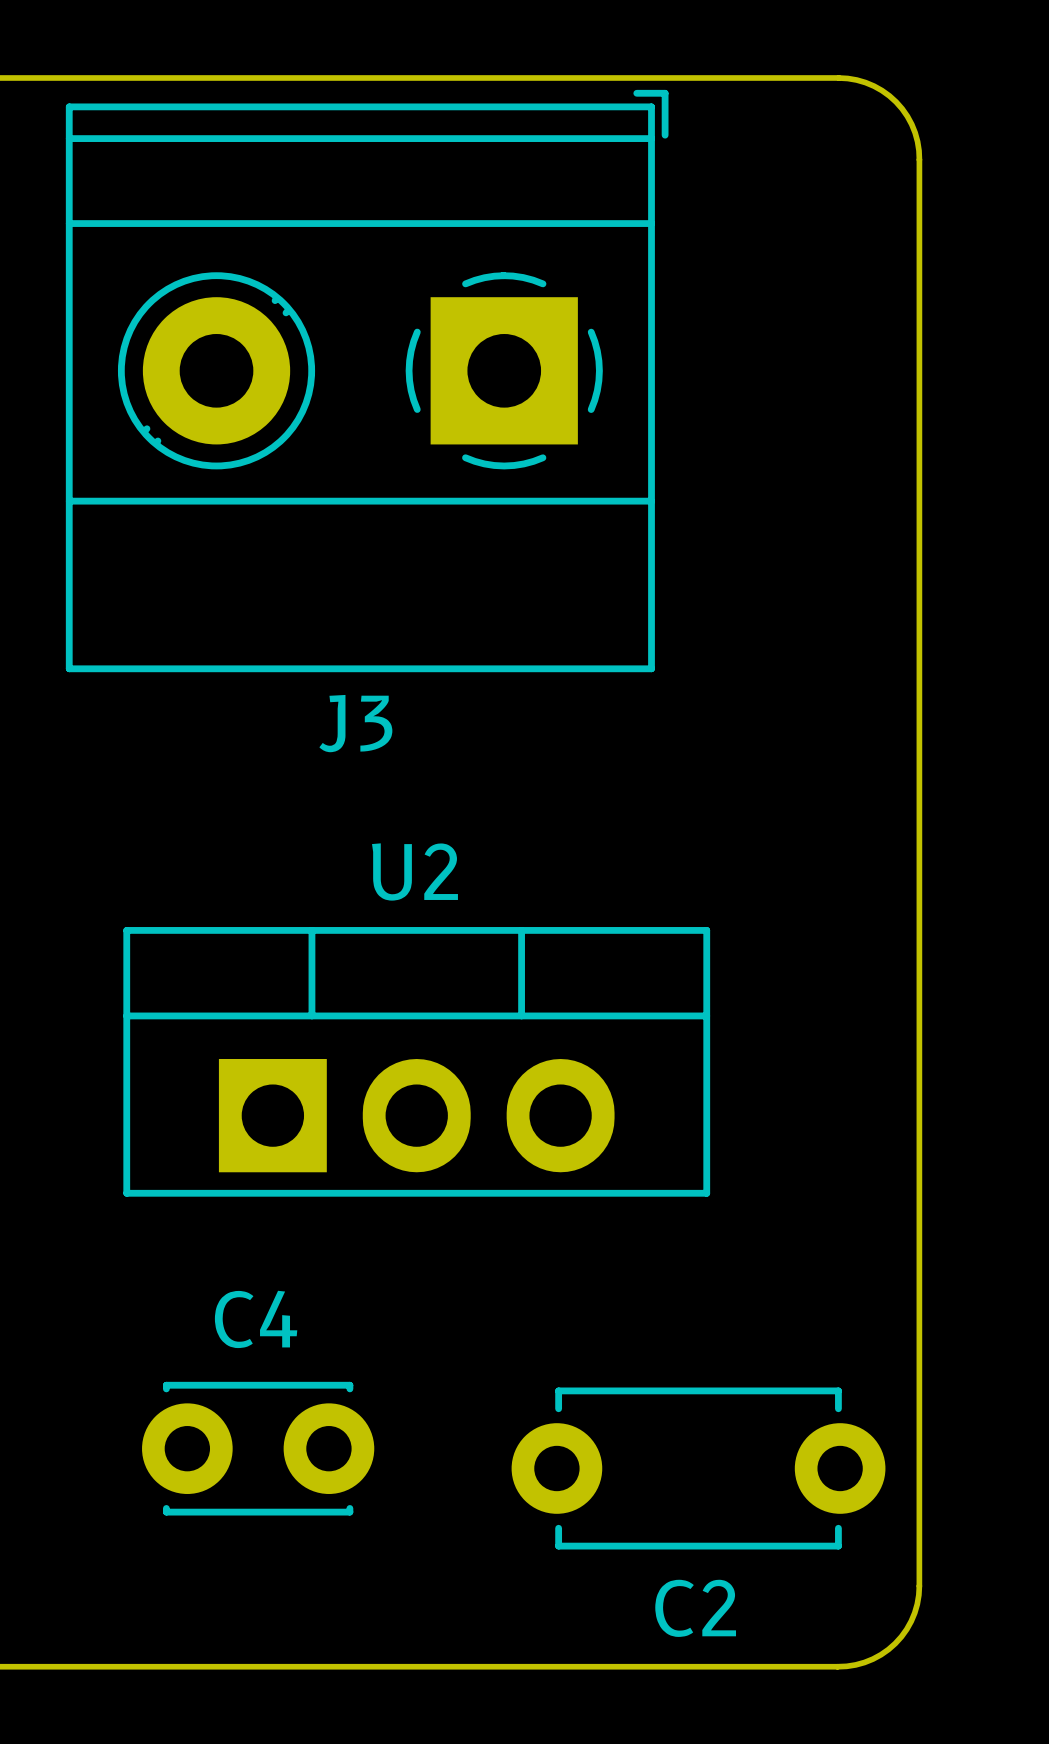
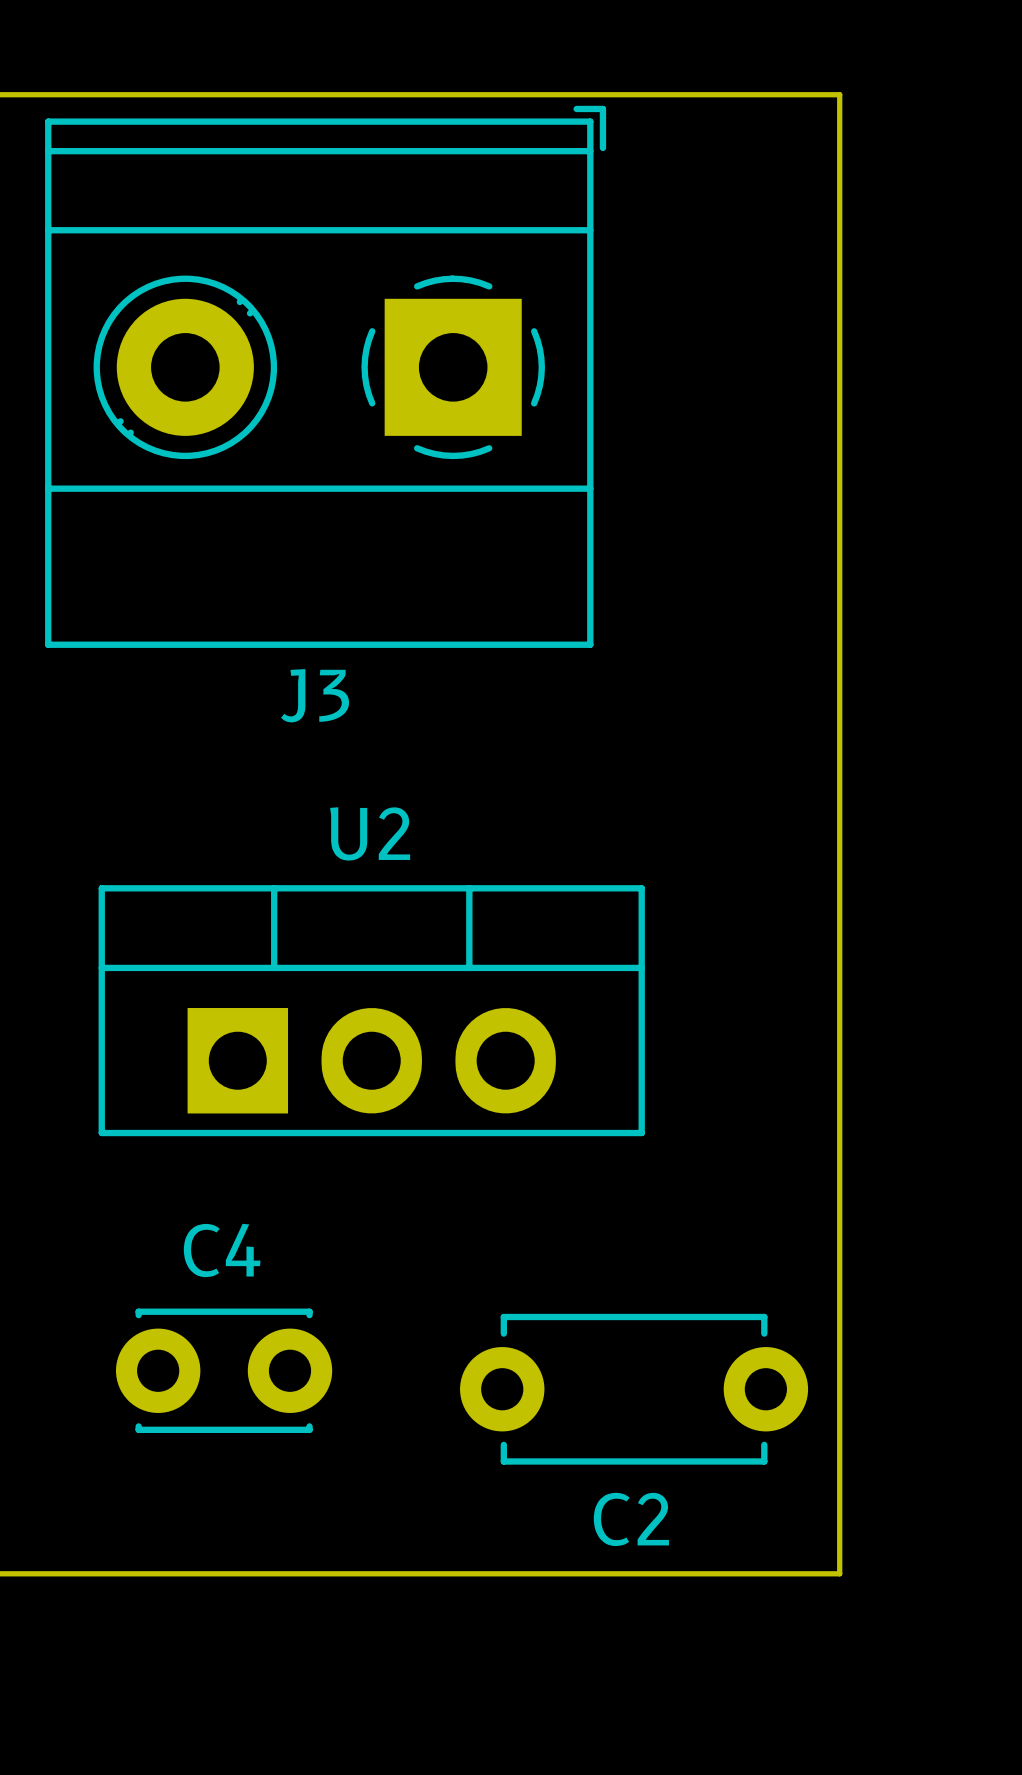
board edge: (838, 77) (865, 82) (889, 95) (907, 116) (915, 132) (919, 150) (919, 1586) (917, 1604) (911, 1621) (895, 1643) (881, 1654) (864, 1662) (837, 1666) -> (764, 94) (839, 94) (839, 1573) (763, 1573)

